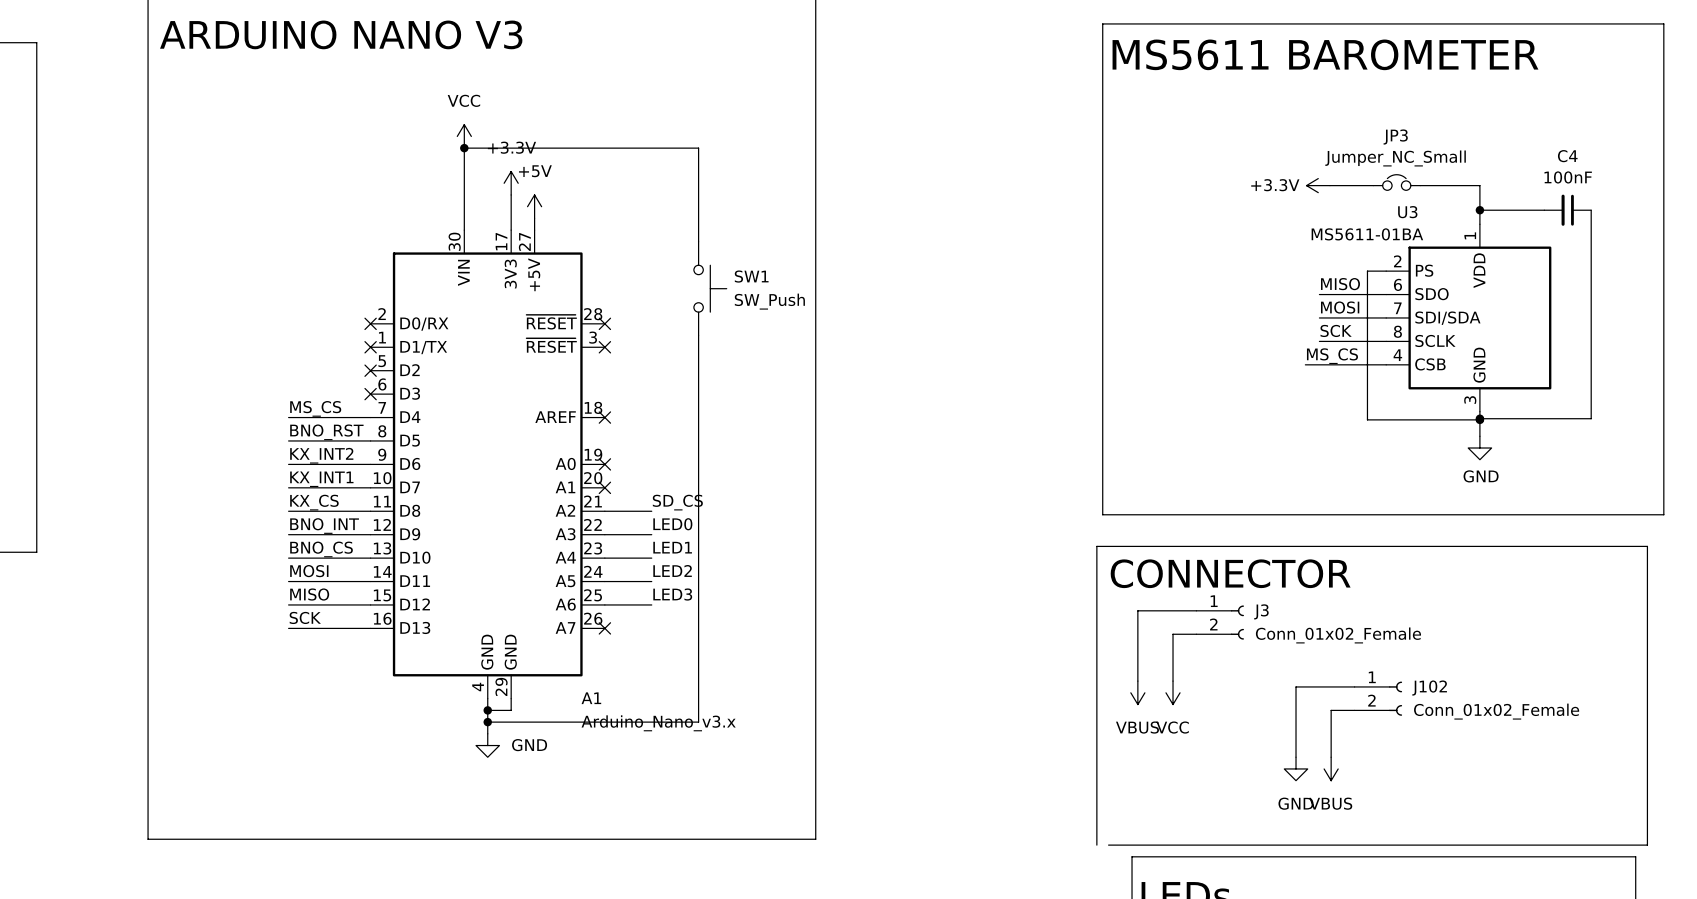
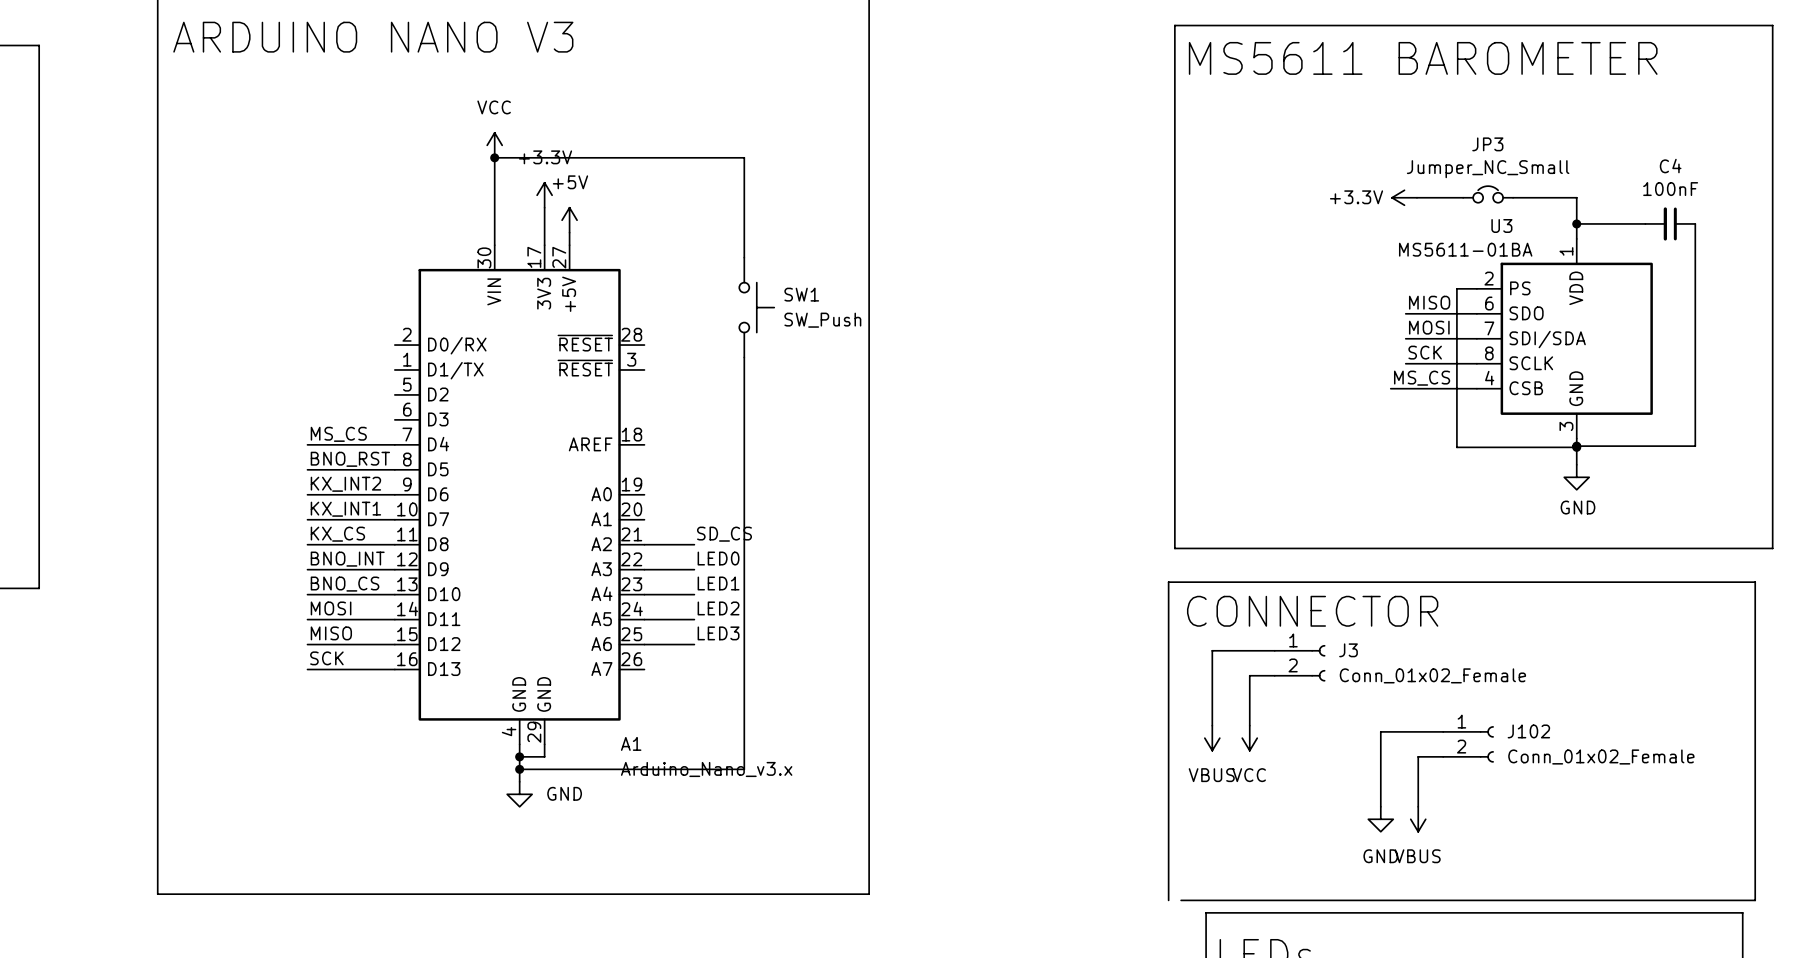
no-connect mark: (370, 323) -> none
no-connect mark: (604, 323) -> none
no-connect mark: (370, 347) -> none
no-connect mark: (604, 347) -> none
no-connect mark: (370, 370) -> none
no-connect mark: (370, 394) -> none
no-connect mark: (604, 417) -> none
no-connect mark: (604, 464) -> none
no-connect mark: (604, 487) -> none
no-connect mark: (604, 628) -> none

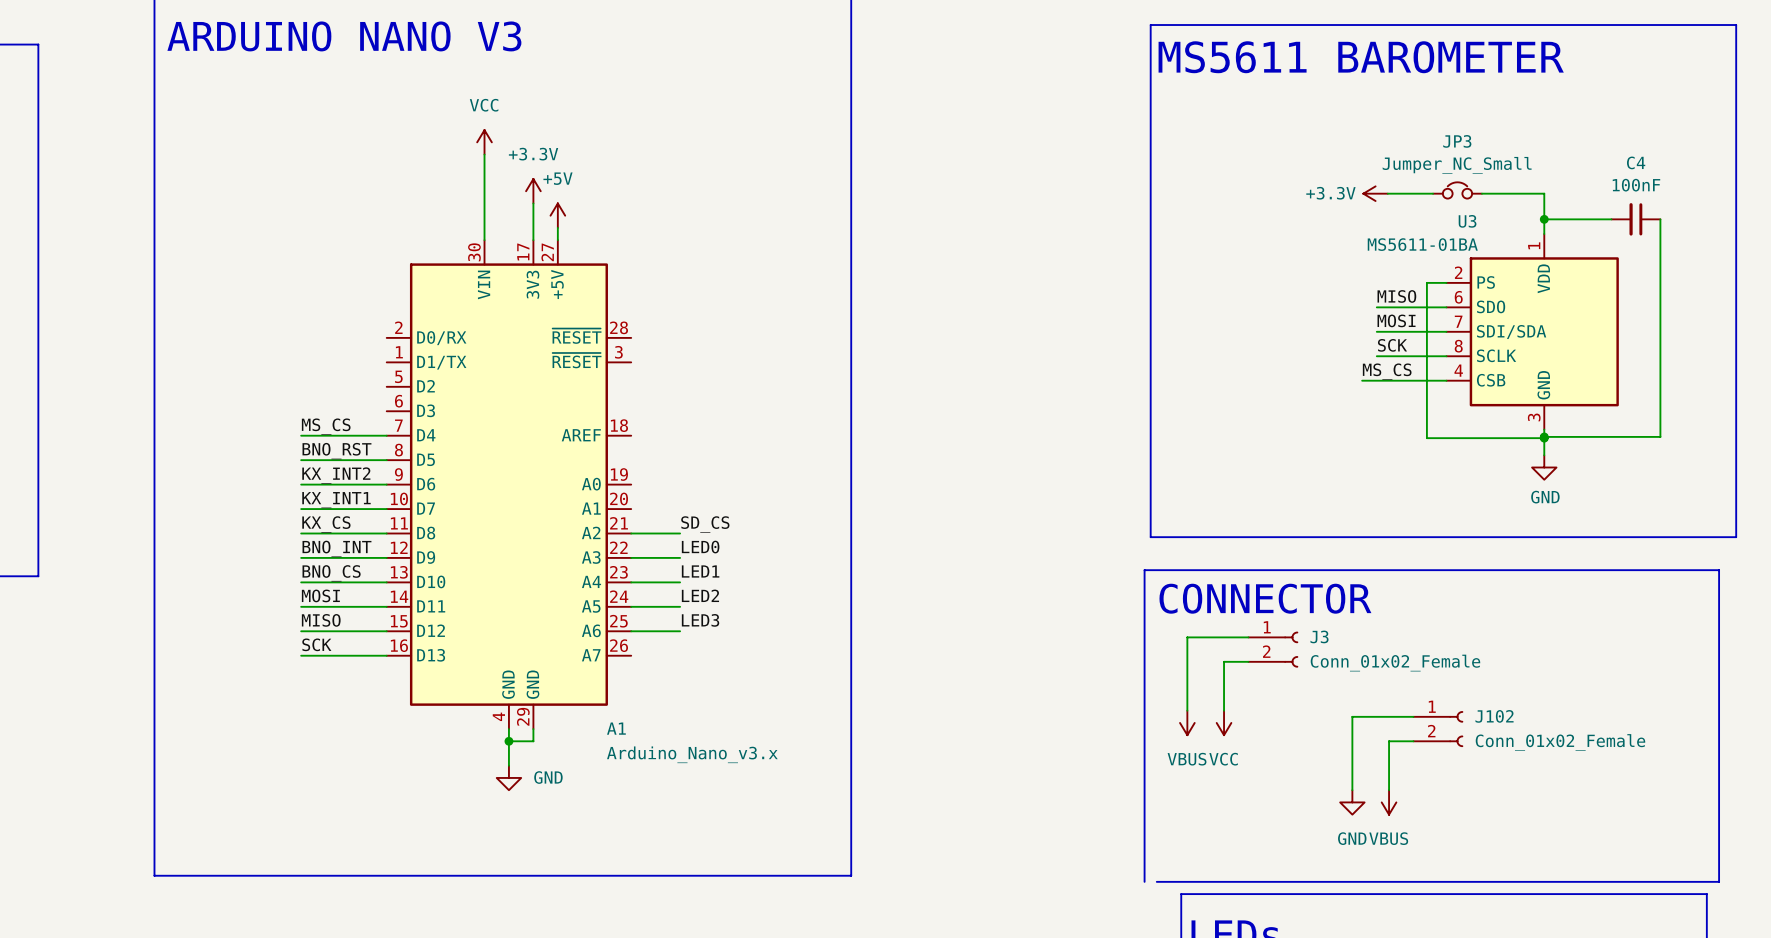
wire: (494, 157) (744, 157) (744, 257) -> none
junction: (494, 157) -> none
SW1: SW_Push (756, 307) -> none
wire: (744, 357) (744, 769) (519, 769) -> none
junction: (519, 769) -> none

